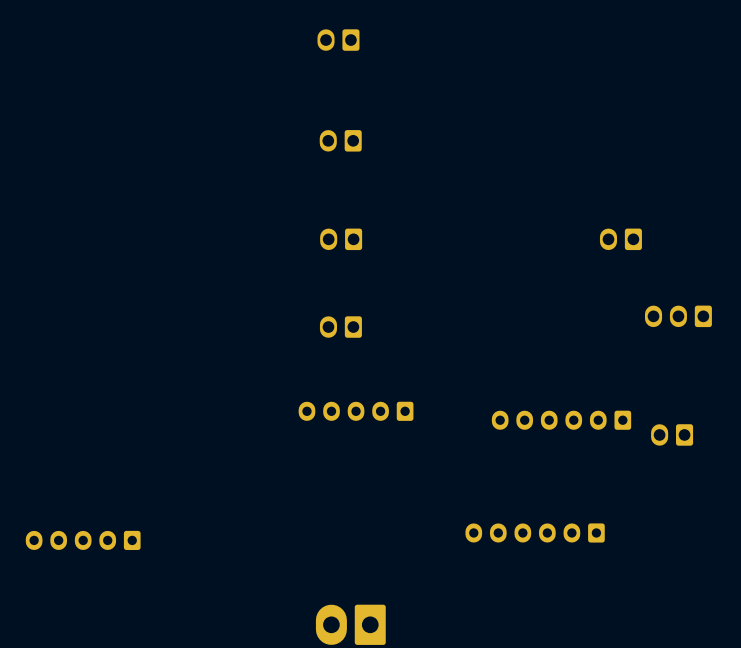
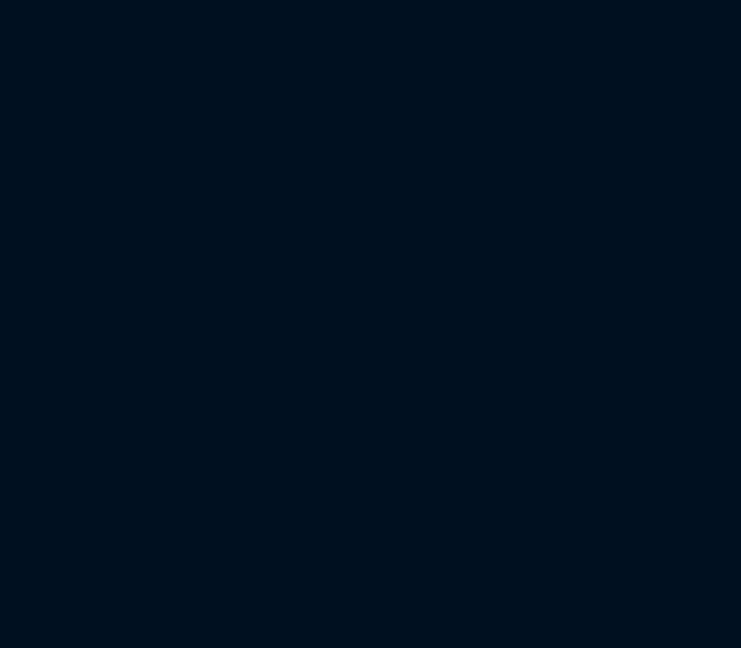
part: (338, 40) -> none
part: (340, 140) -> none
part: (341, 239) -> none
part: (620, 239) -> none
part: (678, 316) -> none
part: (340, 327) -> none
part: (356, 411) -> none
part: (561, 420) -> none
part: (672, 434) -> none
part: (535, 532) -> none
part: (83, 540) -> none
part: (350, 624) -> none

